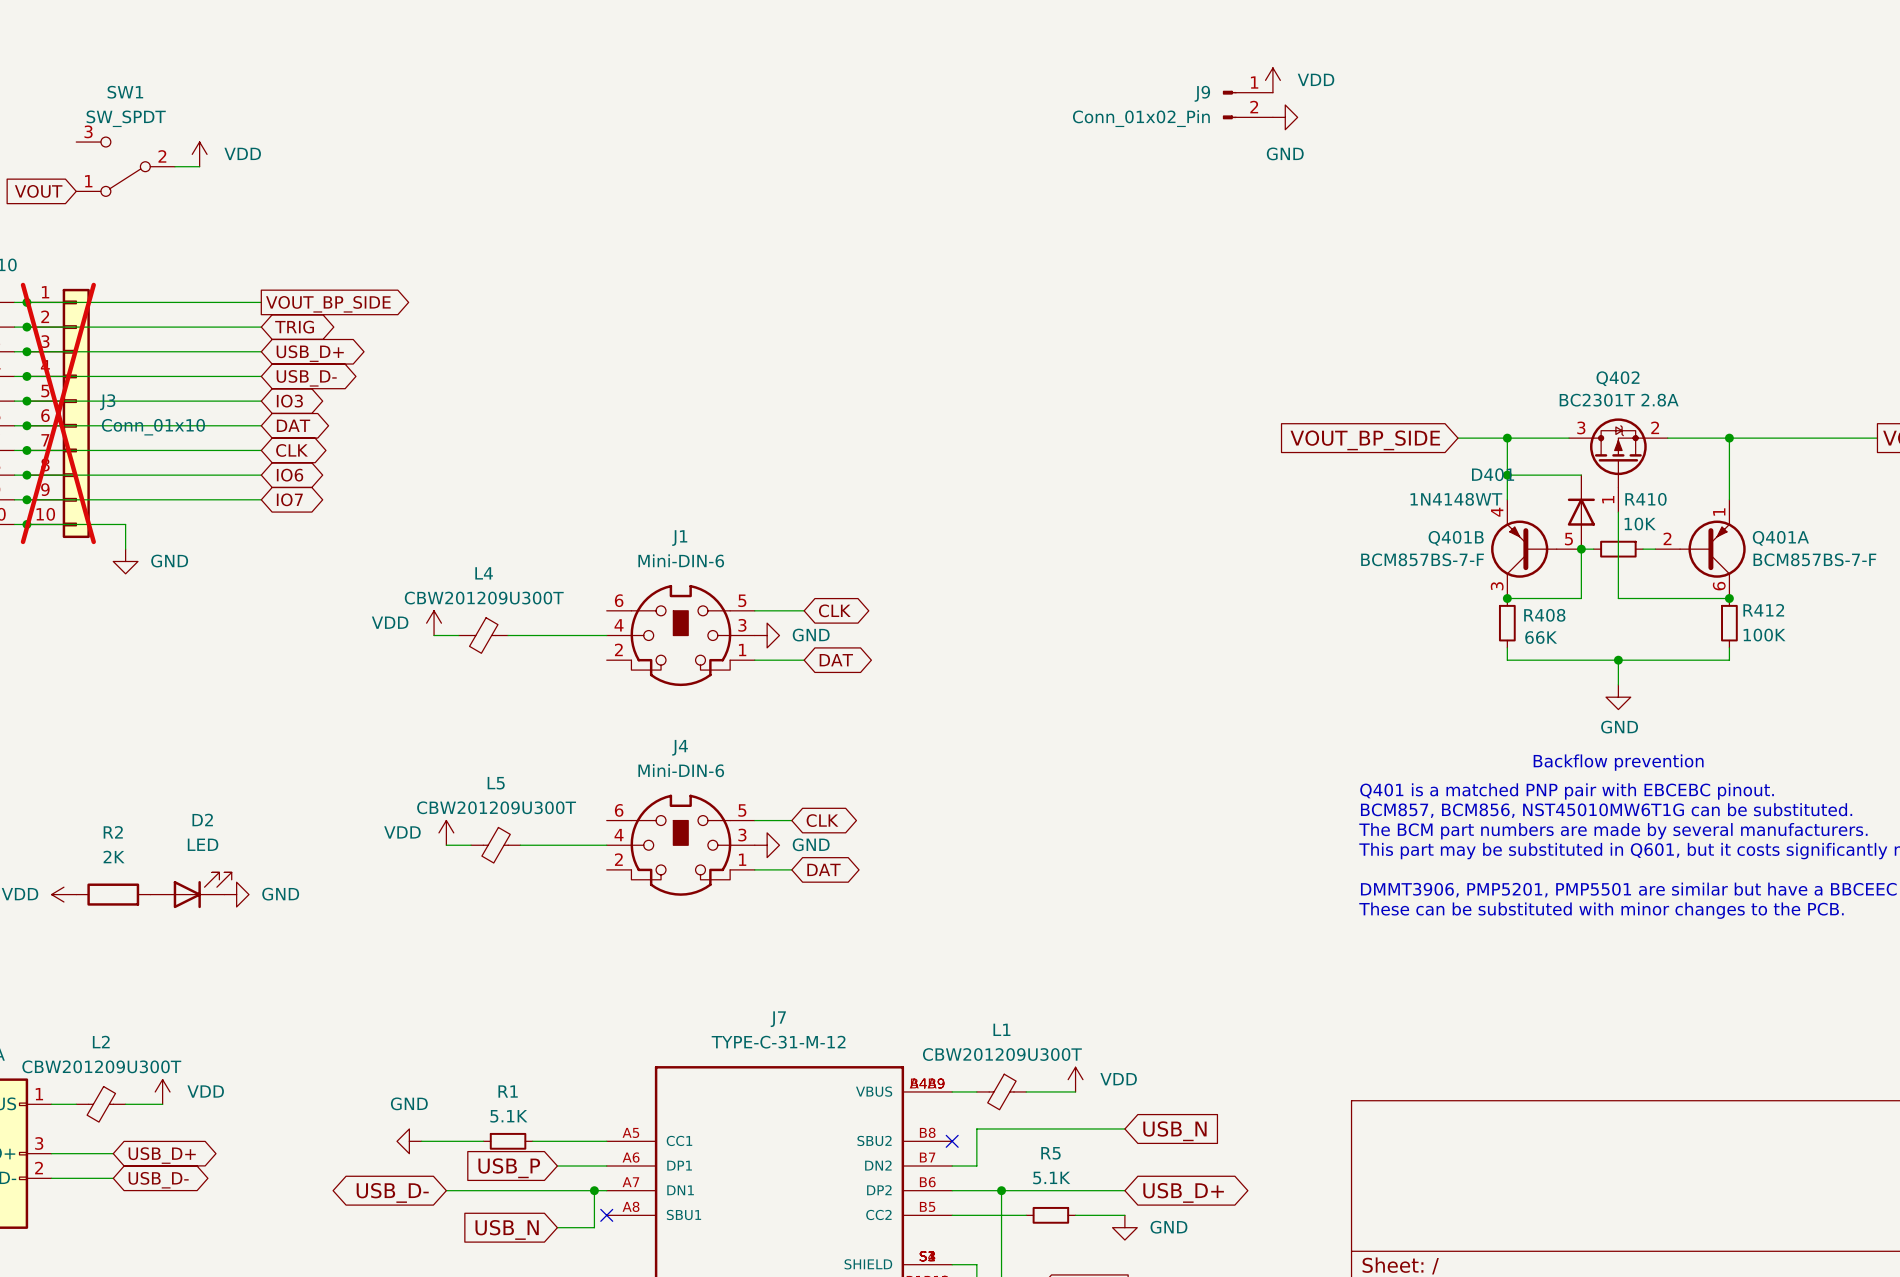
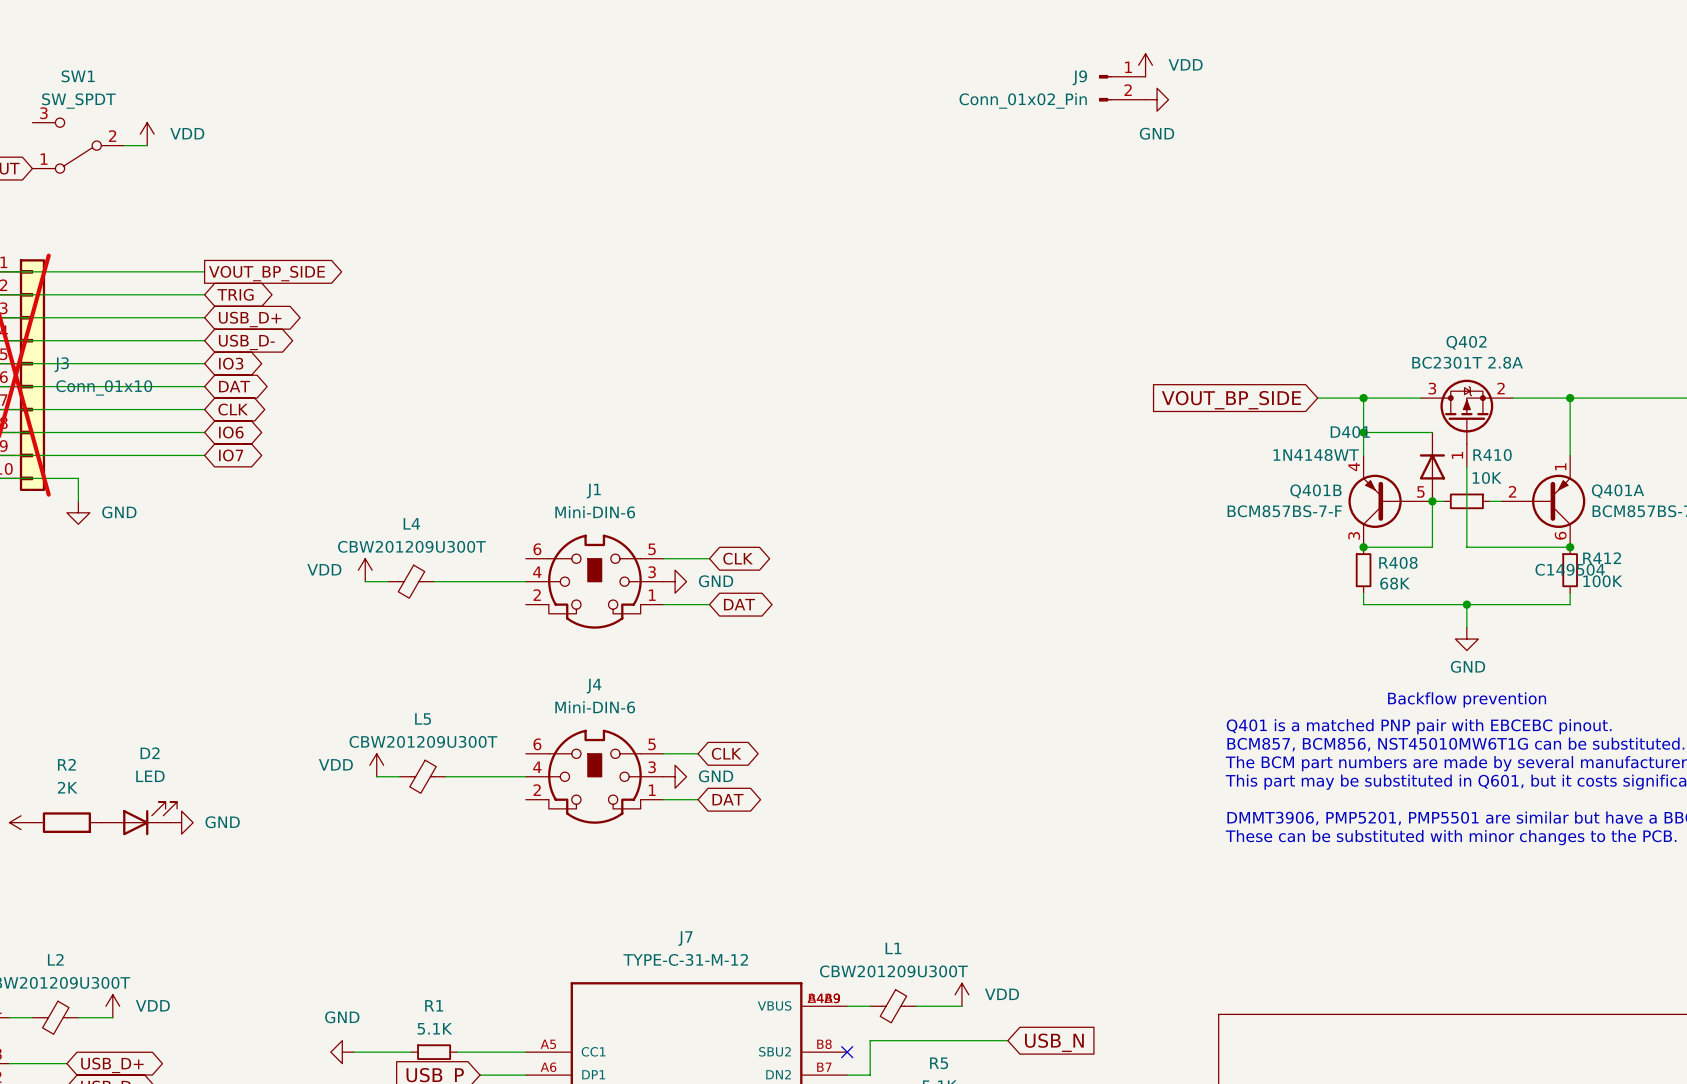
R412 text: none -> C149504 (1570, 569)
R408 value: 66K (1541, 637) -> 68K (1395, 583)

